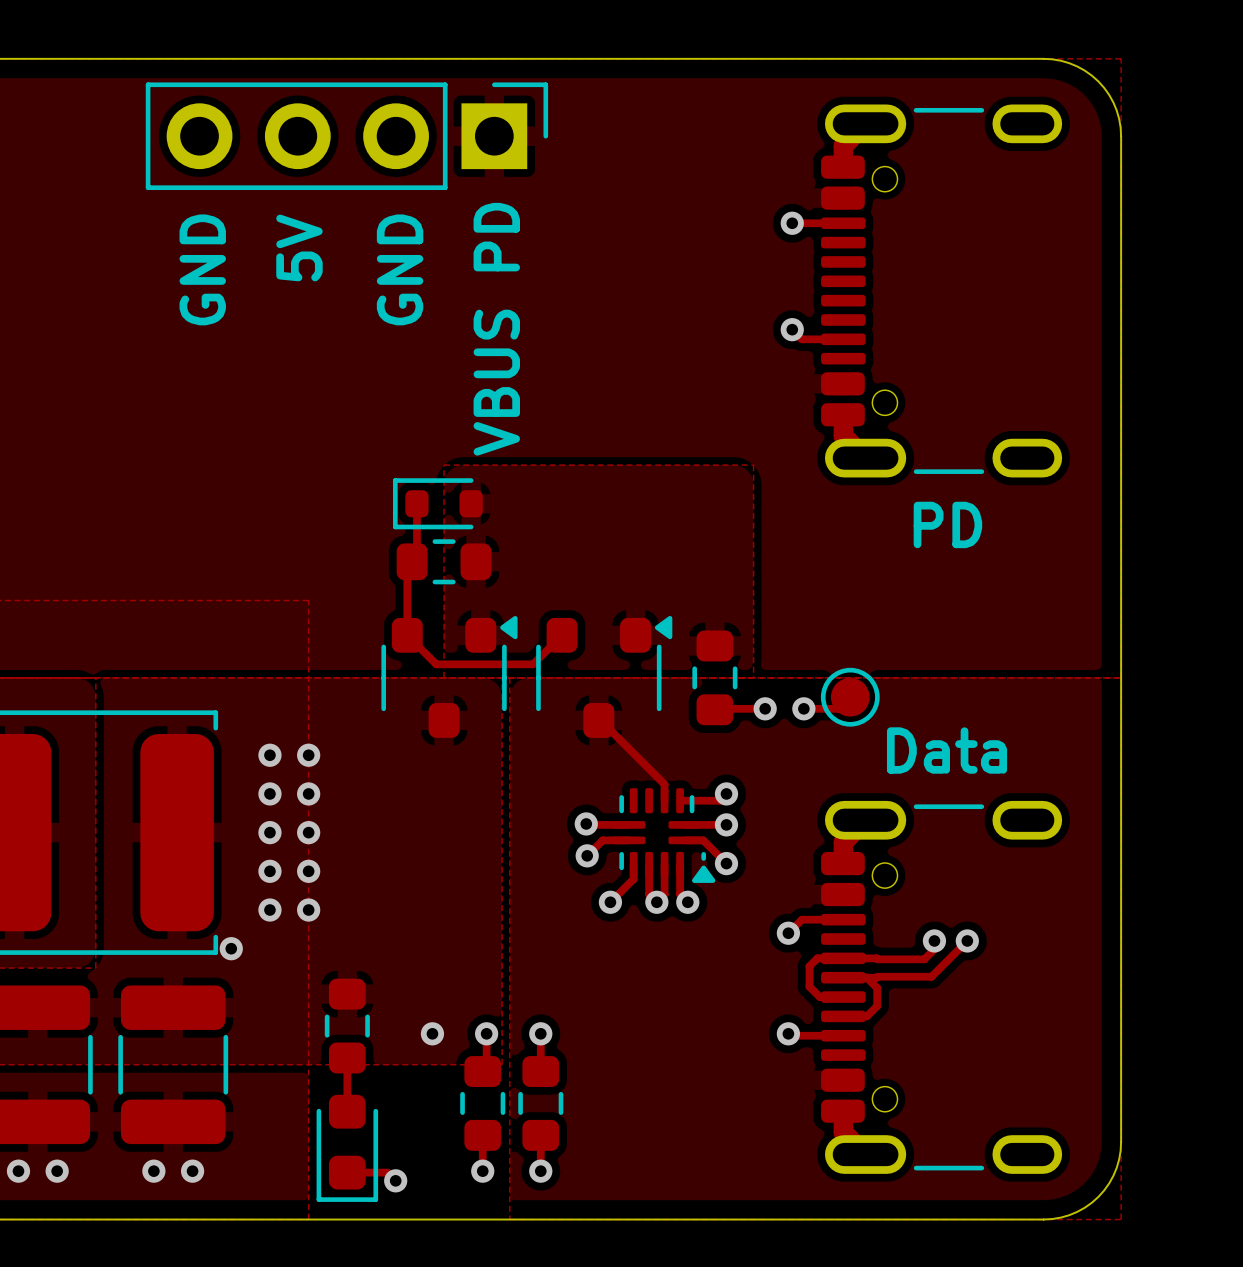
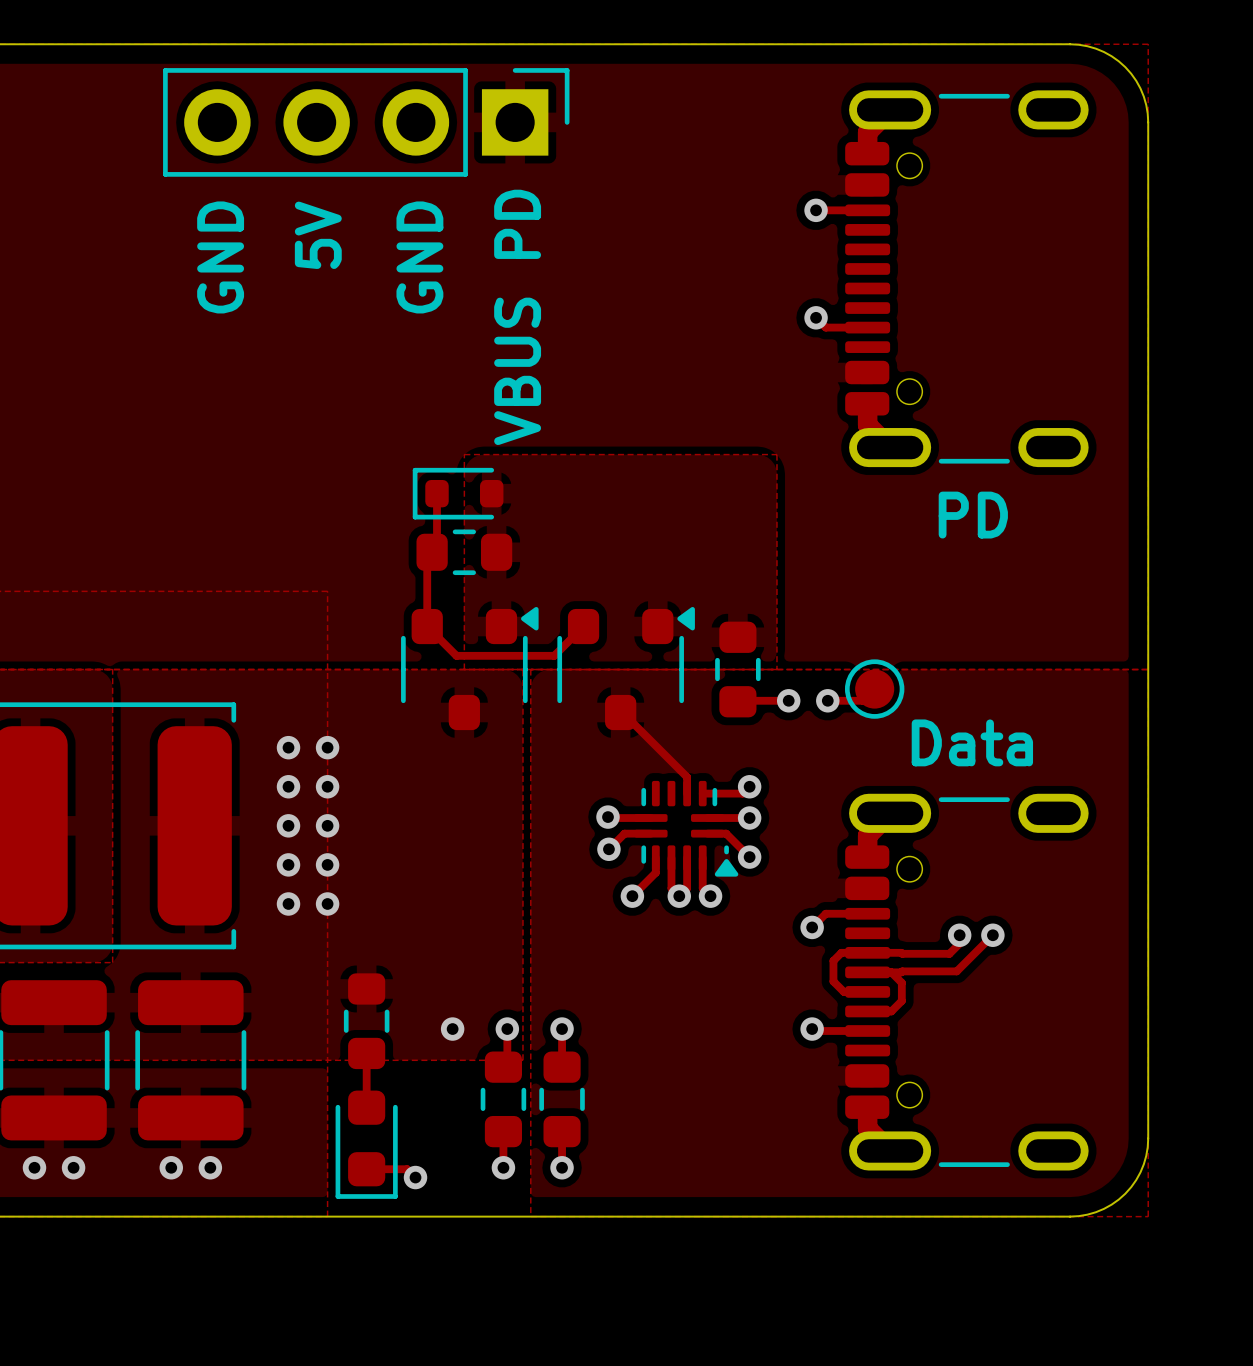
via: (231, 948) -> none

